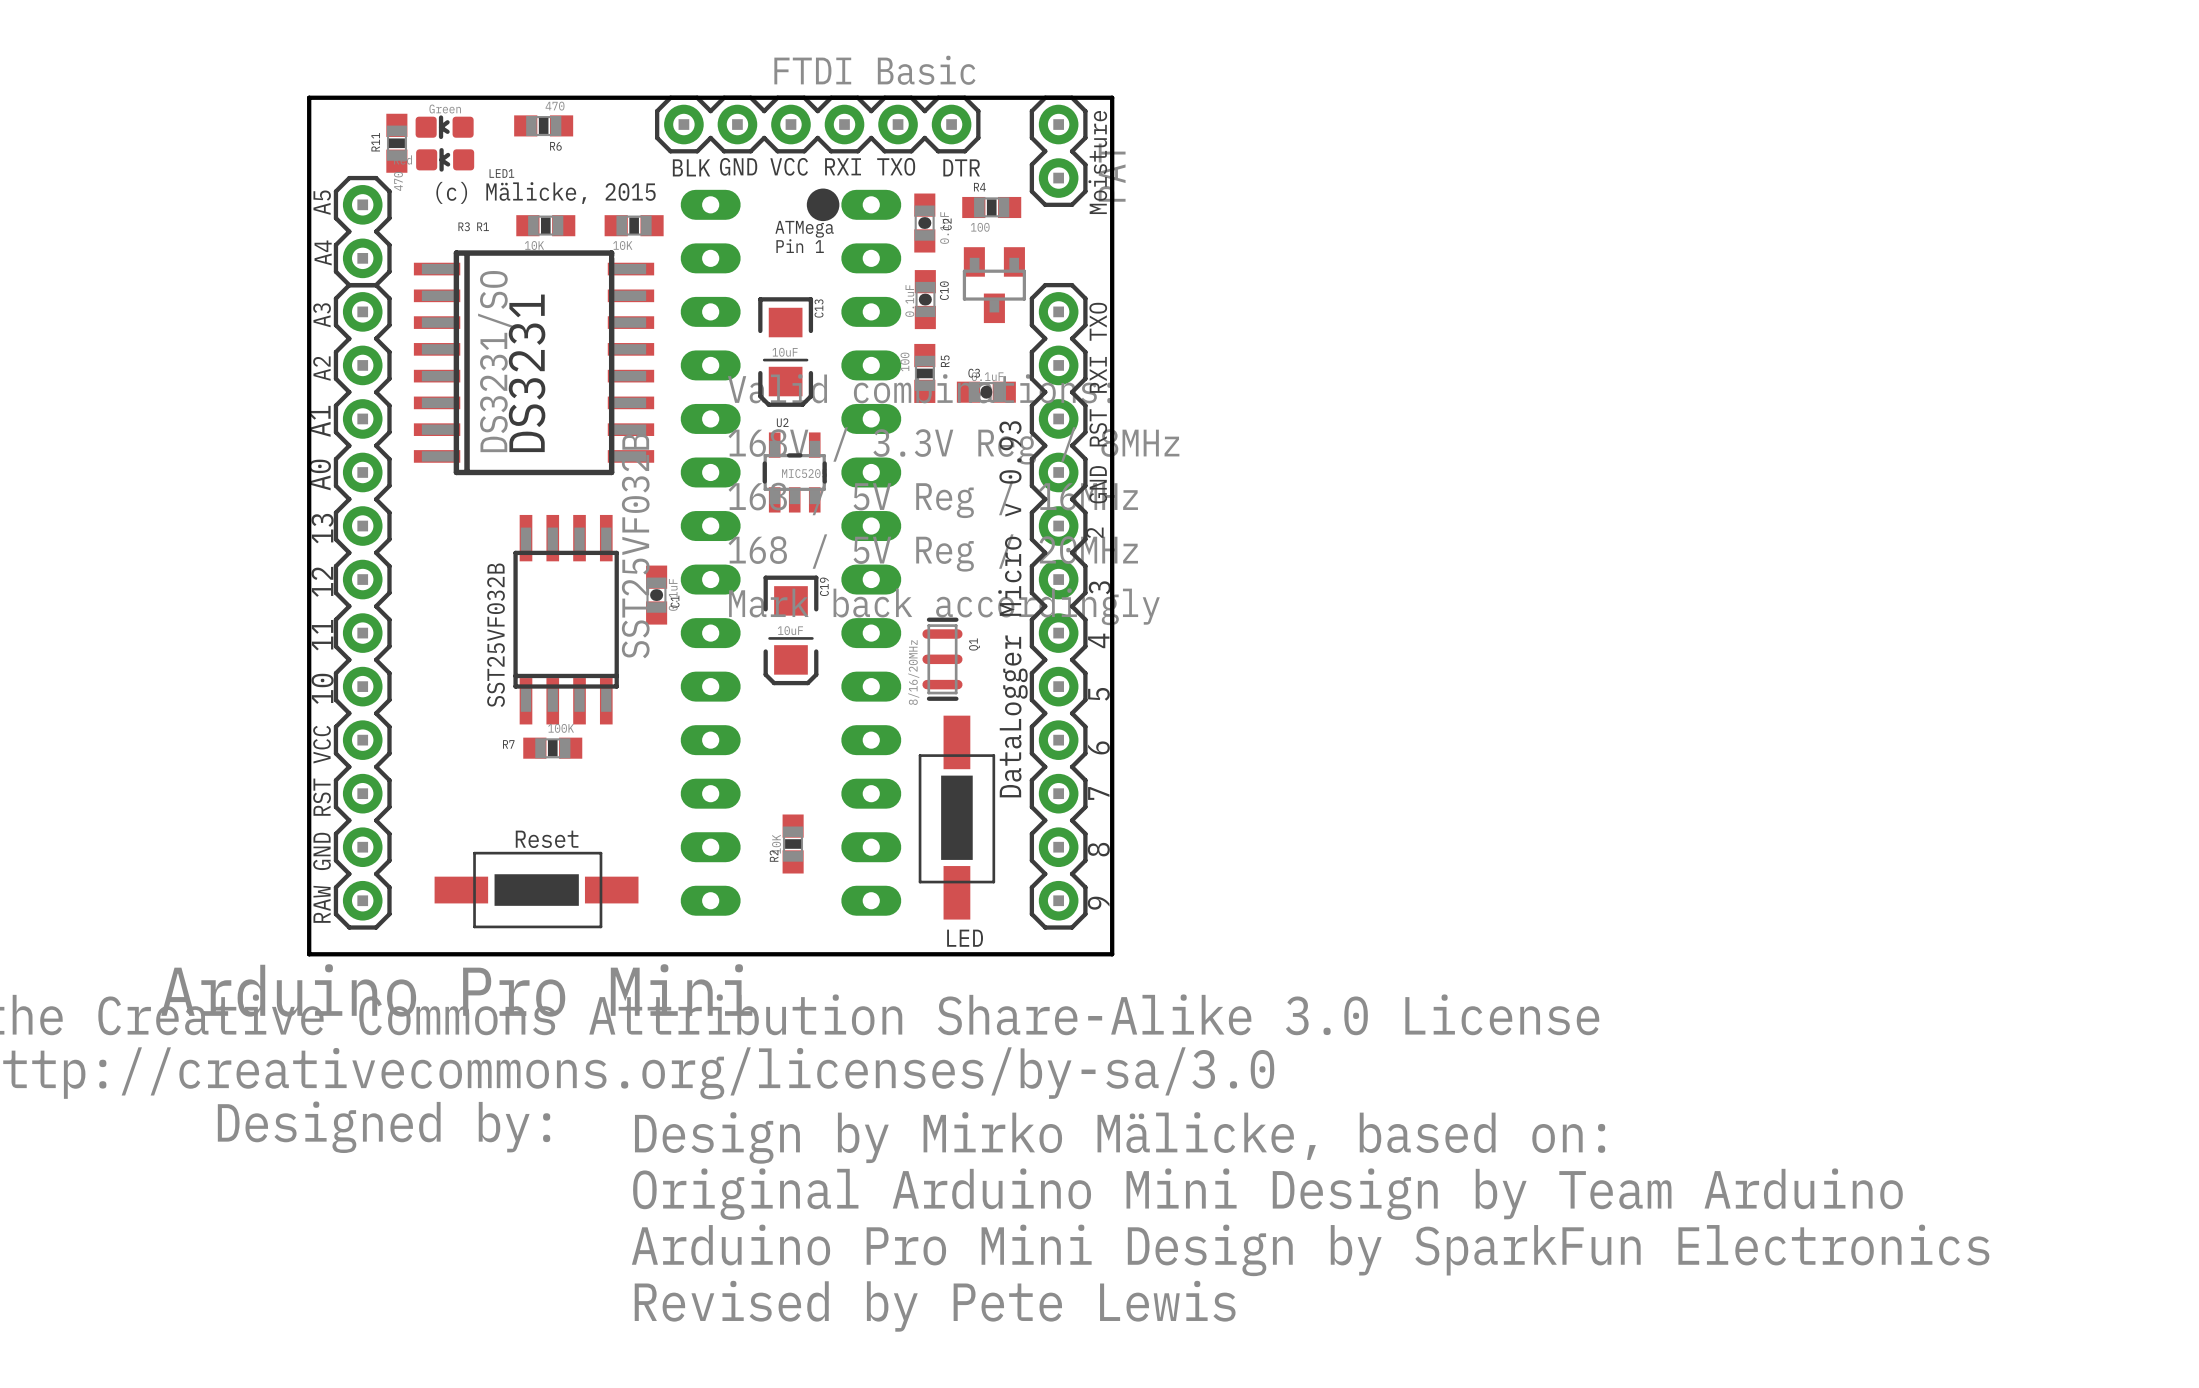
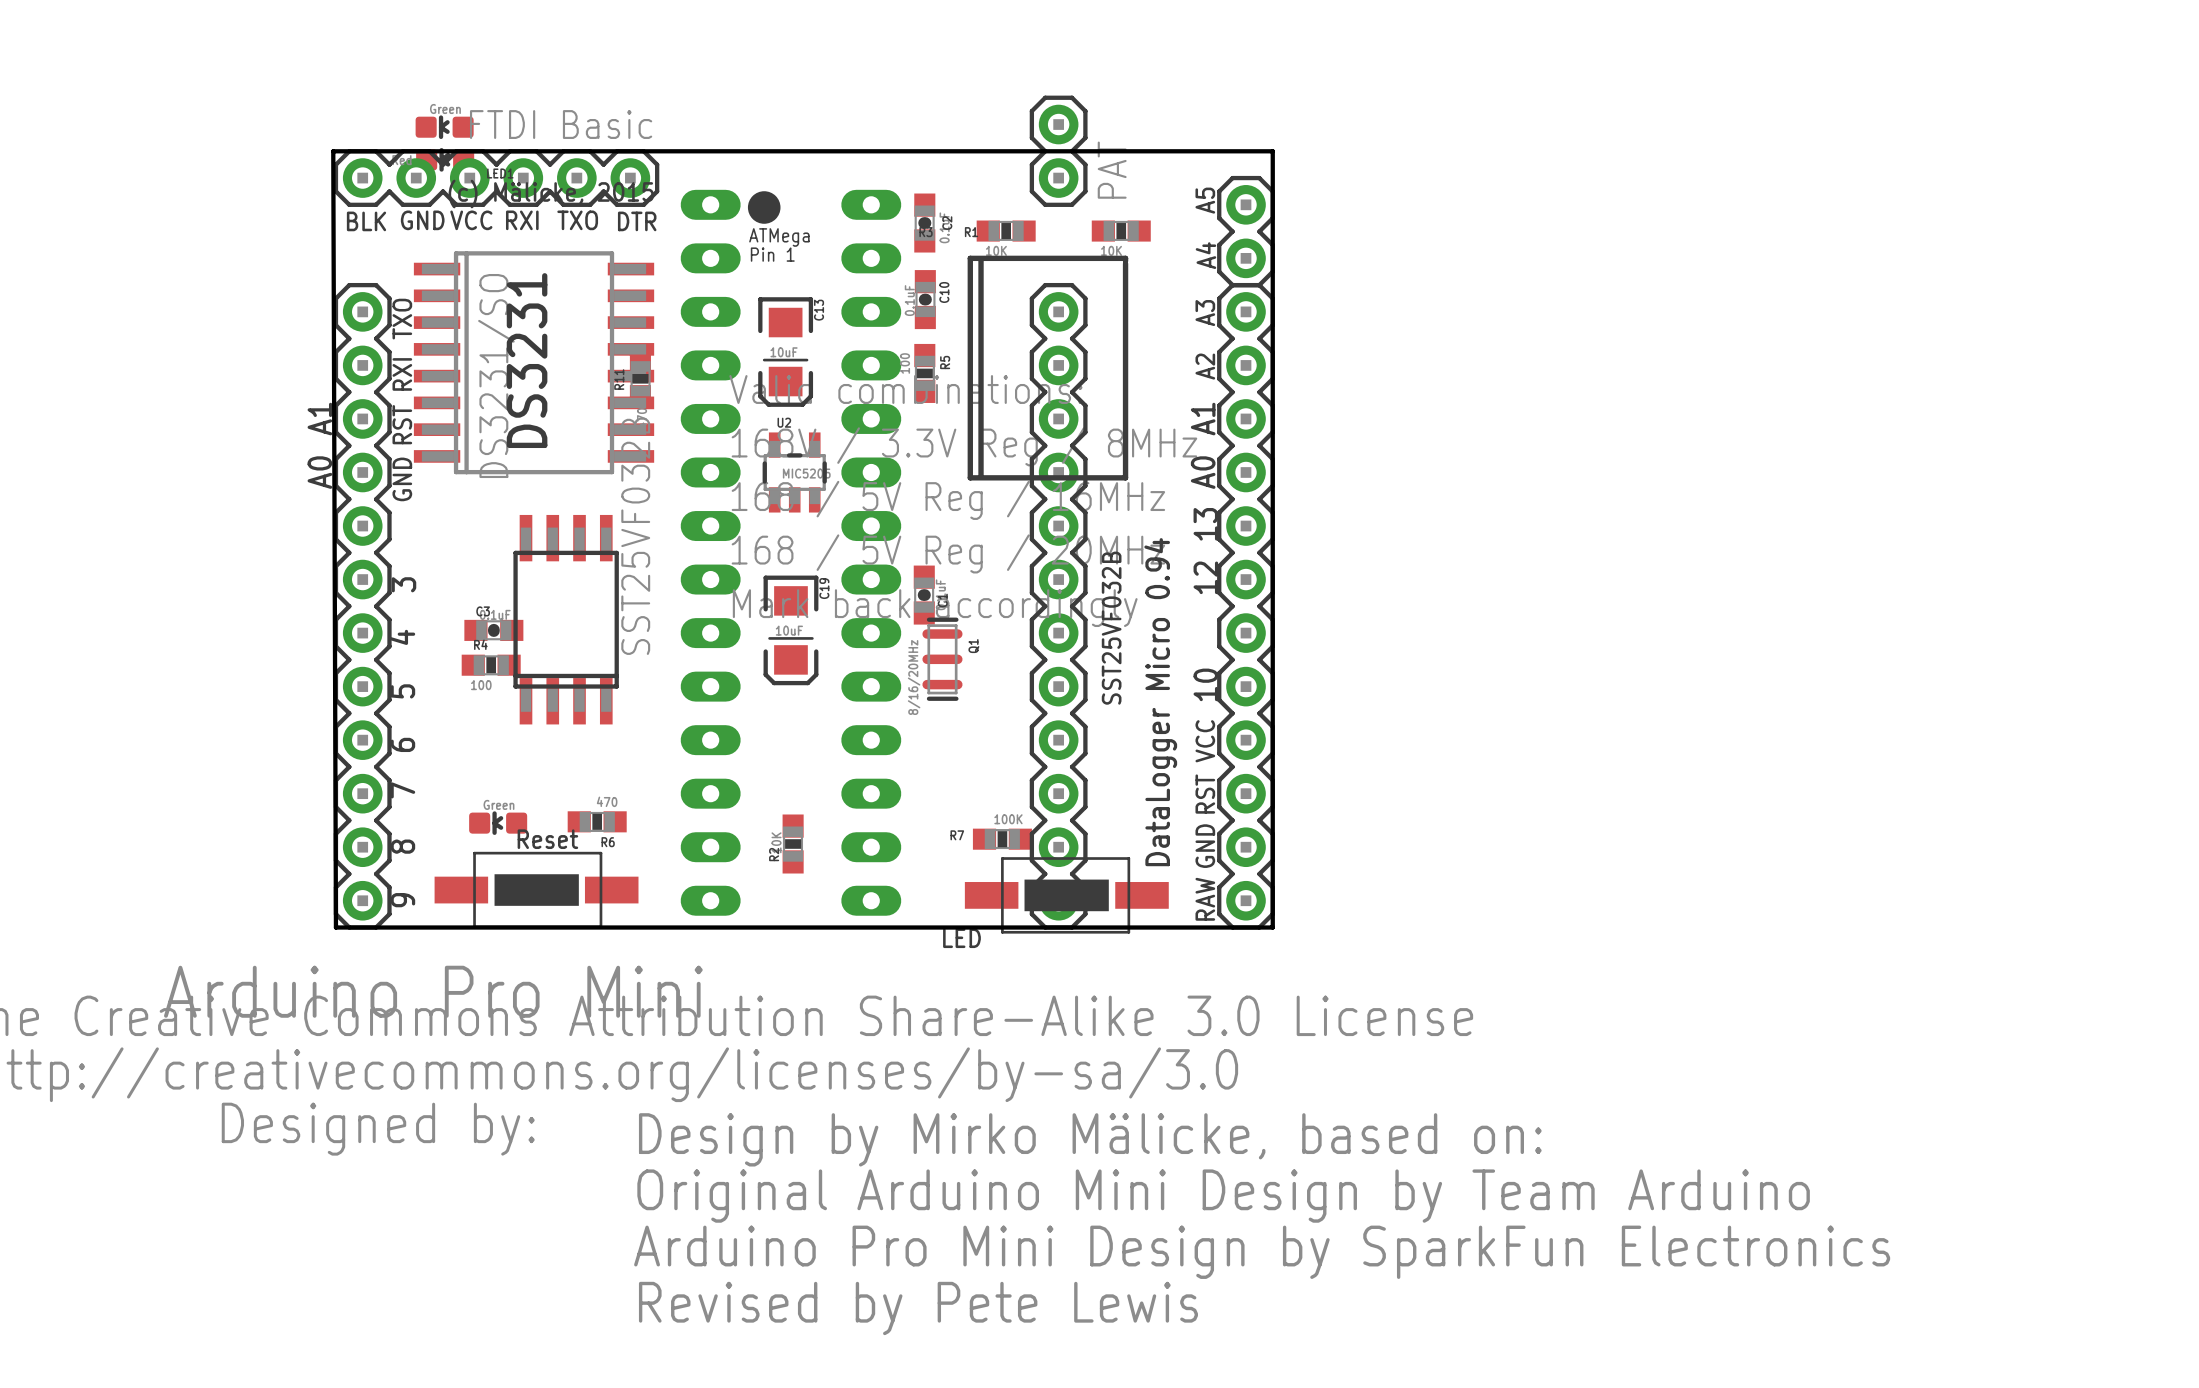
board edge: (309, 97) (309, 954) (1112, 954) (1112, 97) (309, 97) -> (333, 151) (335, 927) (1272, 927) (1272, 151) (333, 151)
part position: (817, 124) -> (496, 178)
R6 position: (543, 125) -> (597, 821)
R11 position: (396, 143) -> (640, 378)
text: Moisture (1097, 162) -> none
text: GND (738, 166) -> none
text: VCC (789, 166) -> none
text: RXI (843, 166) -> none
text: TXO (896, 166) -> none
text position: BLK (691, 167) -> BLK (366, 221)
text position: DTR (961, 167) -> DTR (637, 221)
text: A5 (322, 202) -> none
text: none -> A5 (1205, 200)
drawing position: (823, 204) -> (764, 207)
R4 position: (991, 207) -> (491, 665)
text: none -> GND (422, 220)
text: none -> VCC (471, 220)
text: none -> RXI (522, 220)
text: none -> TXO (577, 220)
R3 position: (545, 225) -> (1006, 231)
R1 position: (634, 225) -> (1121, 231)
text position: ATMega (804, 229) -> ATMega (779, 237)
part: (362, 231) -> none
part: none -> (1246, 231)
text position: Pin 1 (800, 246) -> Pin 1 (772, 254)
text: A4 (323, 252) -> none
text: none -> A4 (1205, 255)
line: (467, 255) (467, 469) -> (981, 261) (981, 475)
line: (611, 255) (611, 253) (456, 253) (456, 472) (611, 472) (611, 258) -> (1125, 261) (1125, 258) (970, 258) (970, 477) (1125, 477) (1125, 263)
part: (994, 285) -> none
text: A3 (322, 315) -> none
text: none -> A3 (1205, 313)
text: none -> TXO (402, 319)
text: TXO (1098, 321) -> none
text: A2 (321, 368) -> none
text: none -> A2 (1205, 366)
text: none -> RXI (402, 374)
text: RXI (1098, 374) -> none
C3 position: (986, 392) -> (493, 630)
text: none -> A1 (1203, 419)
text: none -> RST (402, 424)
text: RST (1098, 427) -> none
text: none -> A0 (1203, 472)
text: none -> GND (402, 479)
text: GND (1098, 484) -> none
text: 13 (322, 528) -> none
text: none -> 13 (1205, 524)
text: 2 (1094, 532) -> none
text: 12 (322, 581) -> none
text: none -> 12 (1205, 577)
text: none -> 3 (403, 584)
text: 3 (1099, 587) -> none
C1 position: (656, 595) -> (924, 595)
part: none -> (1246, 606)
text: DataLogger Micro v 0.93 (1012, 609) -> none
text: 11 (322, 635) -> none
text: SST25VF032B (496, 635) -> none
text: none -> 4 (402, 637)
text: 4 (1098, 640) -> none
text: 10 (322, 688) -> none
text: none -> 10 (1205, 684)
text: none -> 5 (402, 691)
text: 5 (1098, 694) -> SST25VF032B (1111, 628)
text: none -> DataLogger Micro 0.94 (1160, 702)
text: VCC (322, 744) -> none
text: none -> VCC (1205, 741)
text: none -> 6 (402, 744)
text: 6 (1098, 747) -> none
R7 position: (552, 748) -> (1002, 839)
text: none -> 7 (402, 790)
text: 7 (1098, 793) -> none
text: RST (322, 797) -> none
text: none -> RST (1205, 794)
part rotation: 0° (956, 817) -> 90° clockwise (1066, 895)
part position: (956, 817) -> (1066, 895)
part: none -> Green (498, 823)
text: none -> 8 (402, 846)
text: 8 (1098, 849) -> none
text: GND (322, 851) -> none
text: none -> GND (1205, 846)
text: none -> 9 (402, 900)
text: 9 (1098, 903) -> none
text: RAW (322, 904) -> none
text: none -> RAW (1205, 899)

